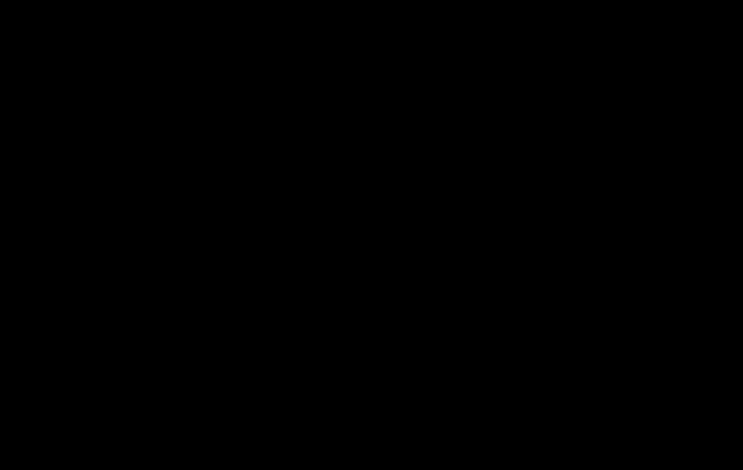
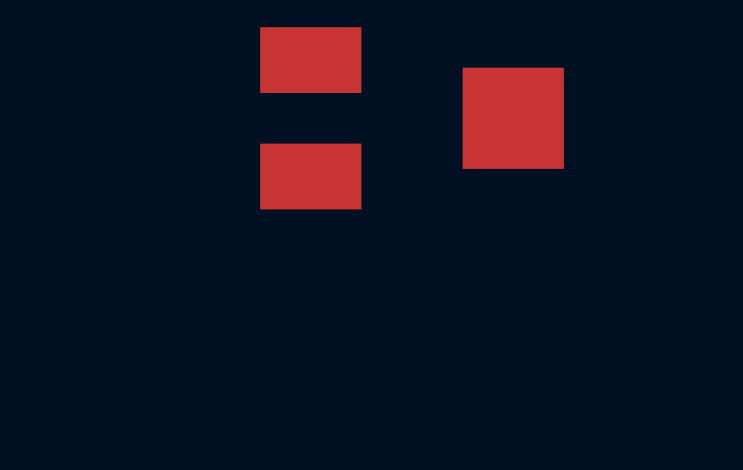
part: none -> (412, 118)

